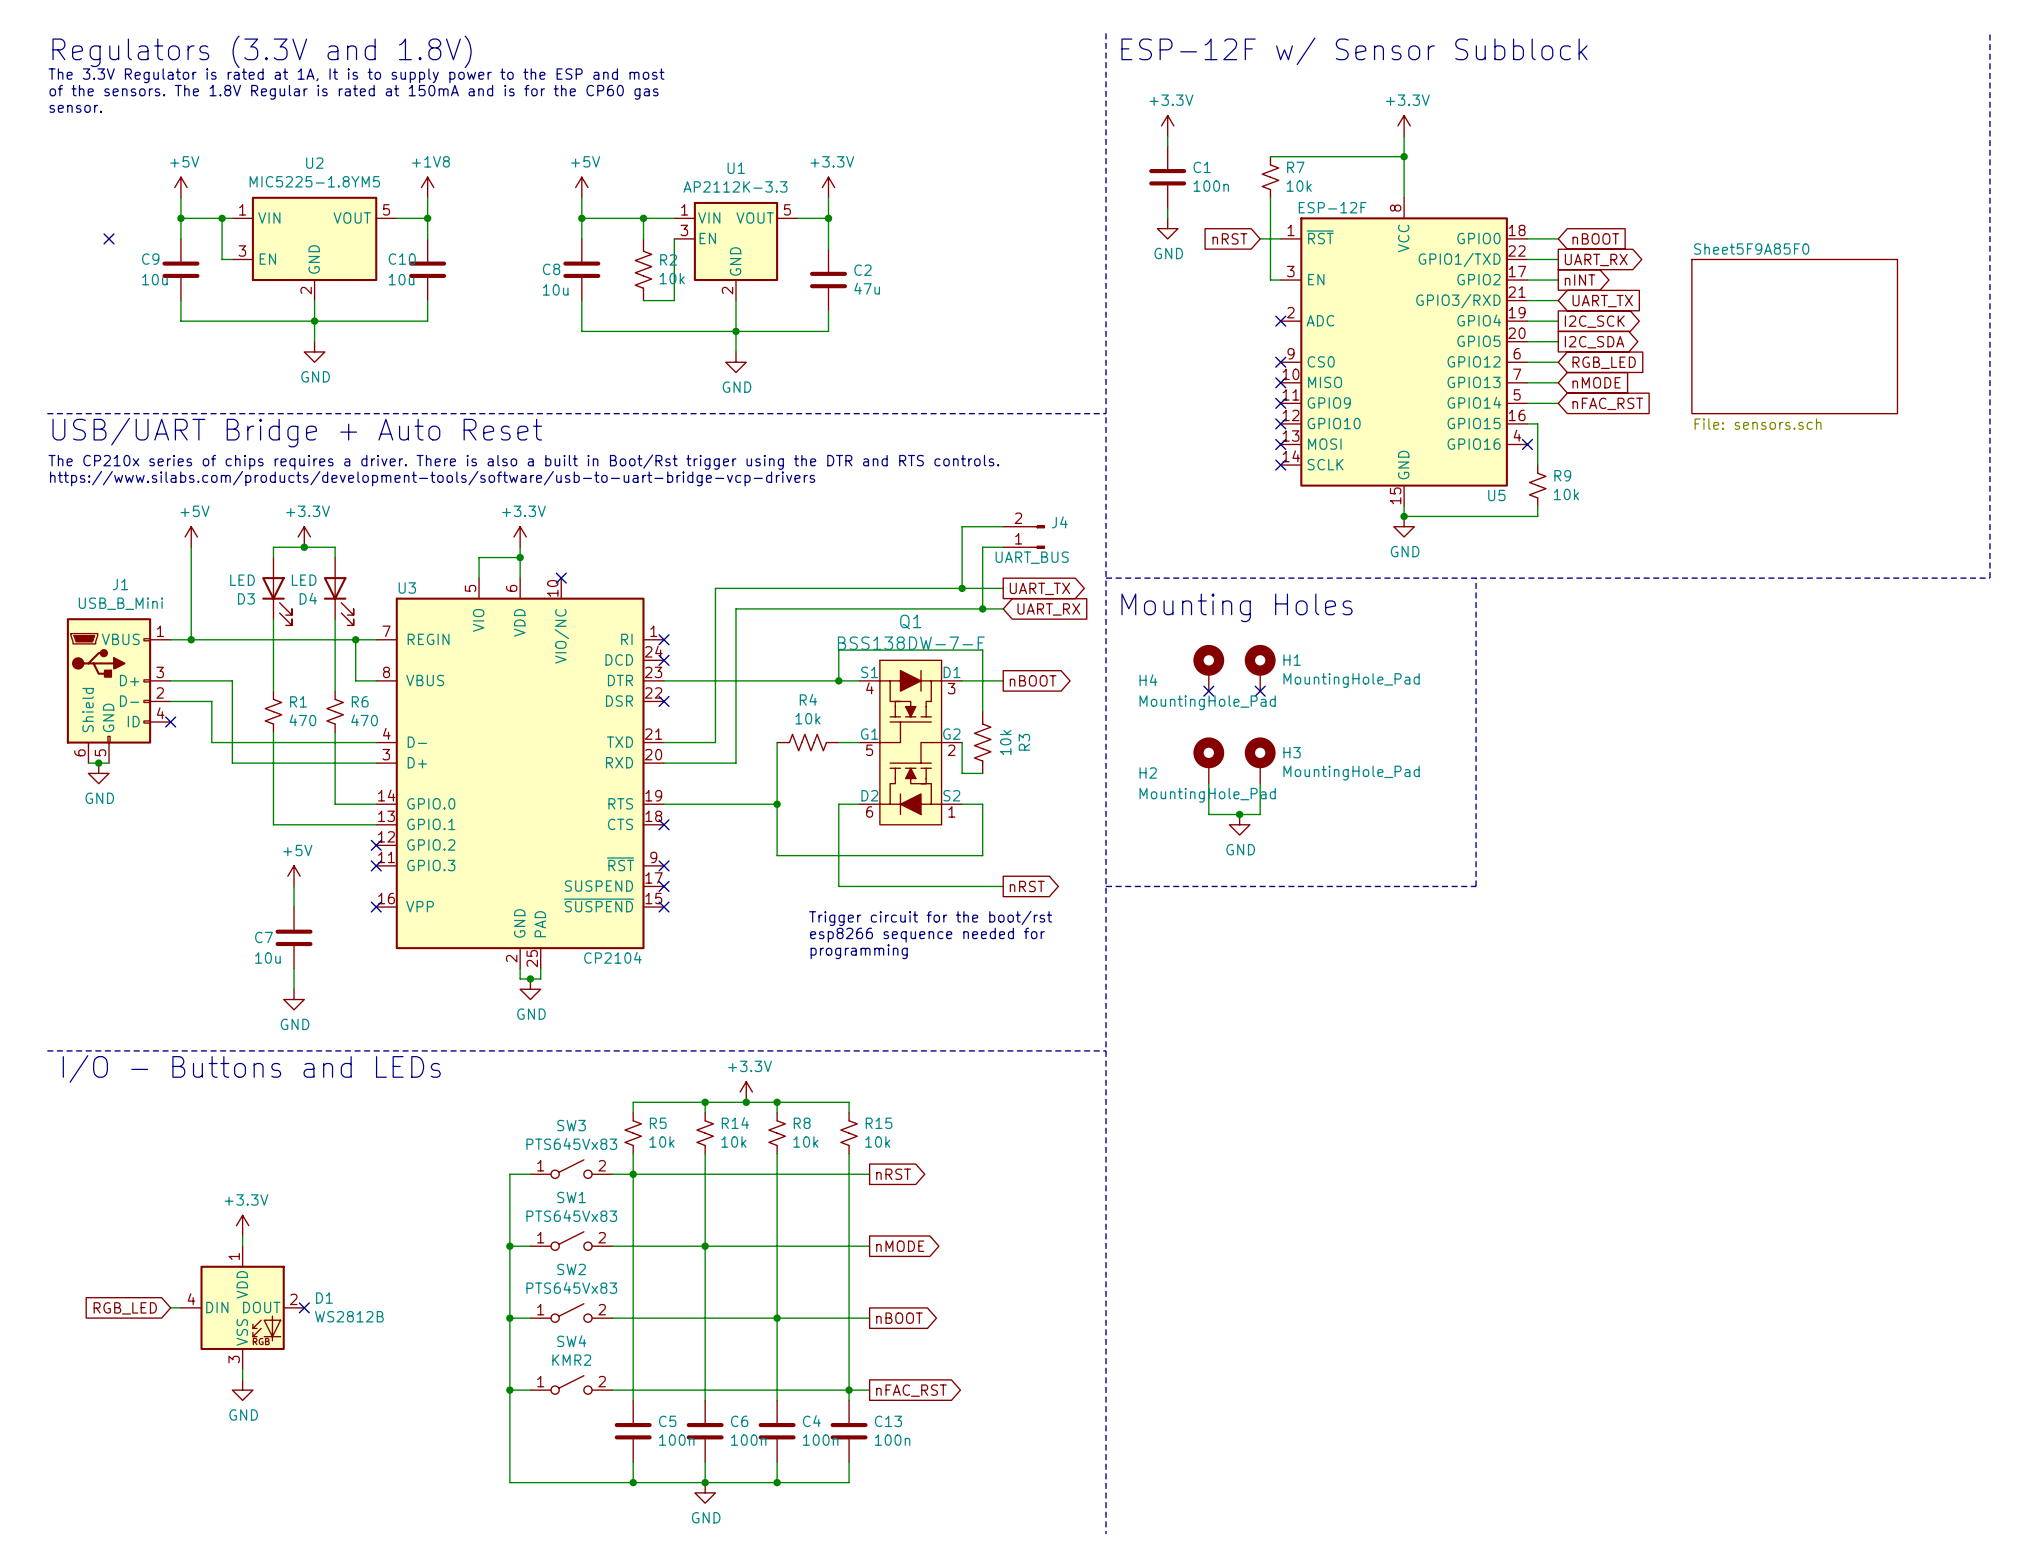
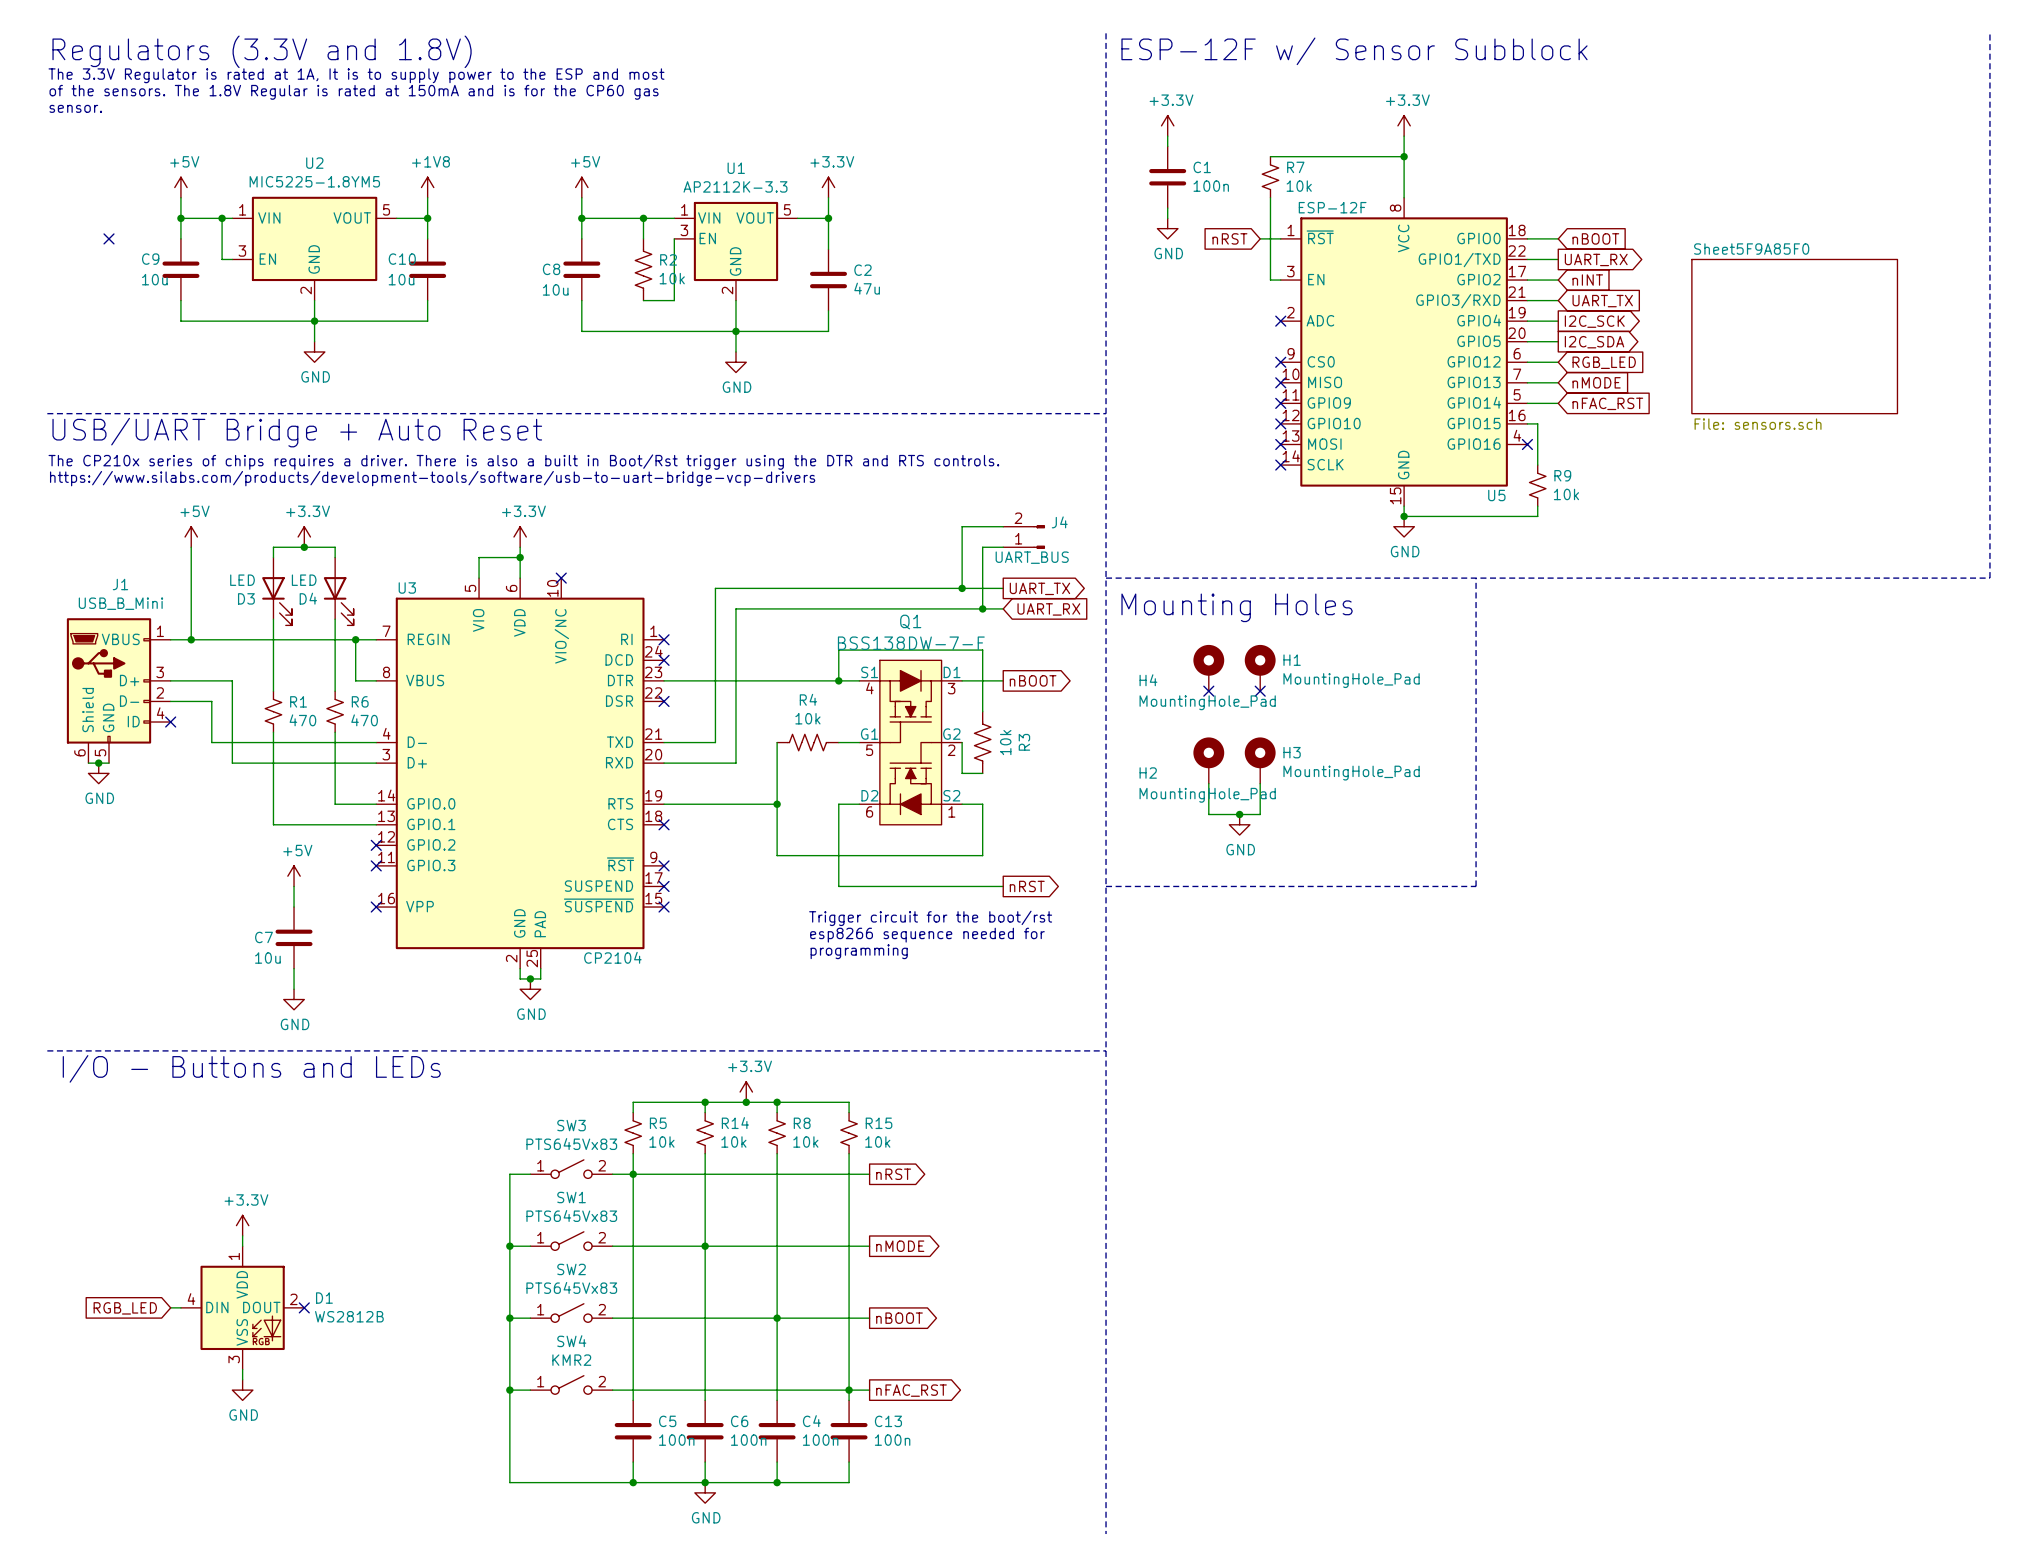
global label shape: output (1580, 280) -> input (1587, 280)

